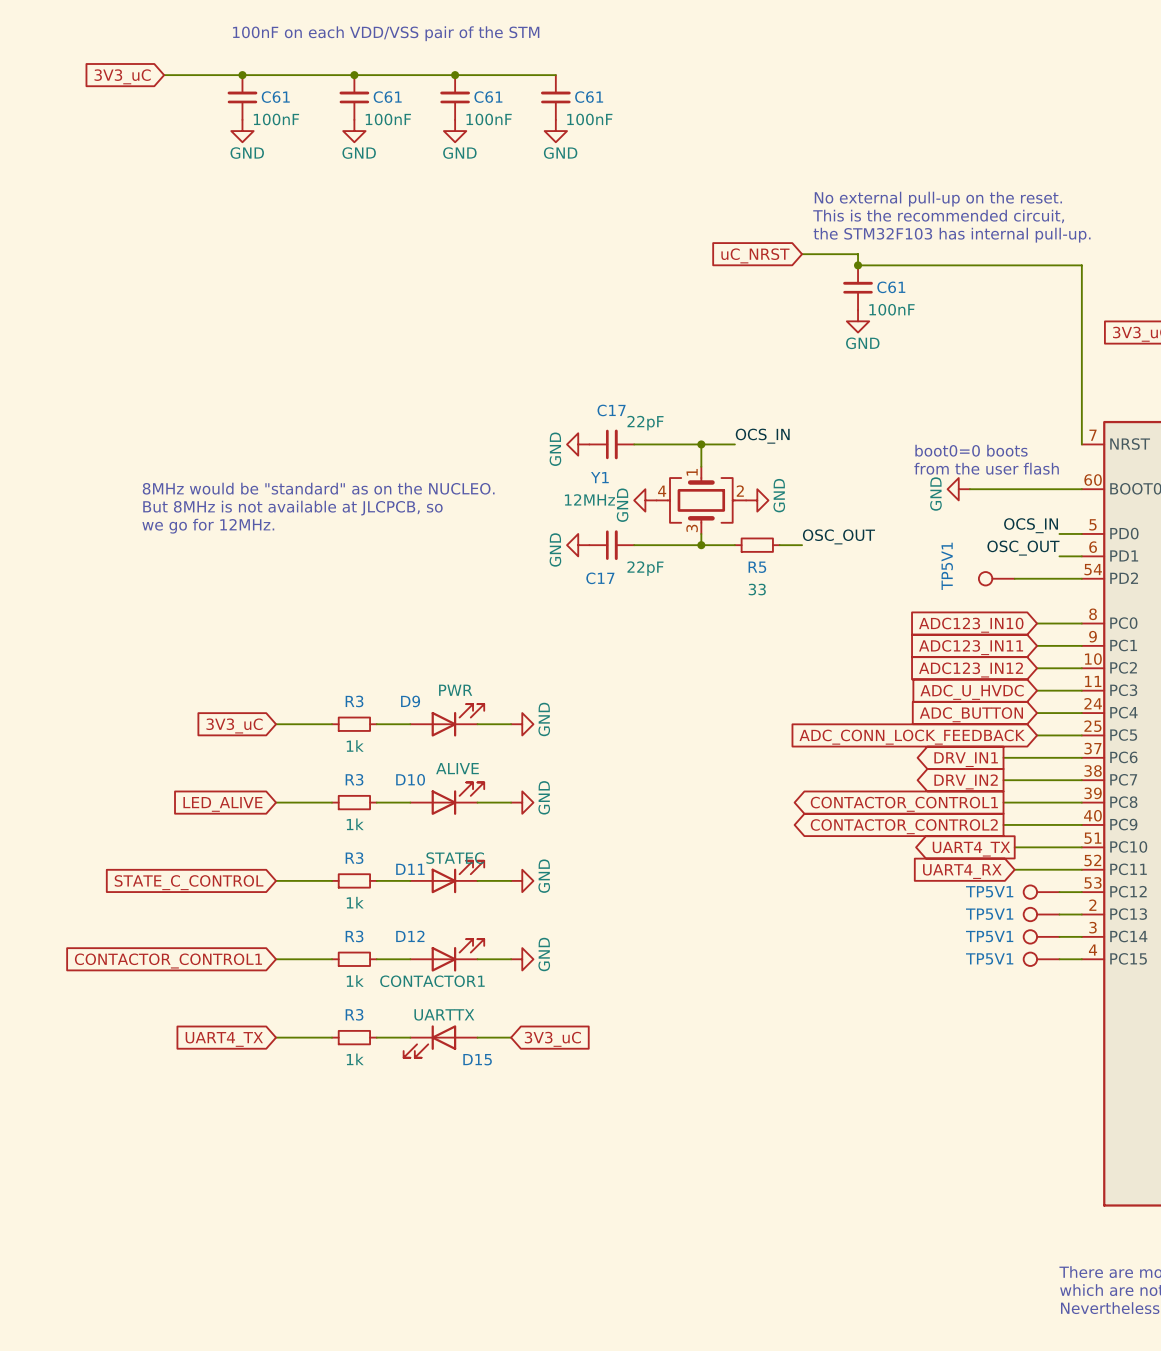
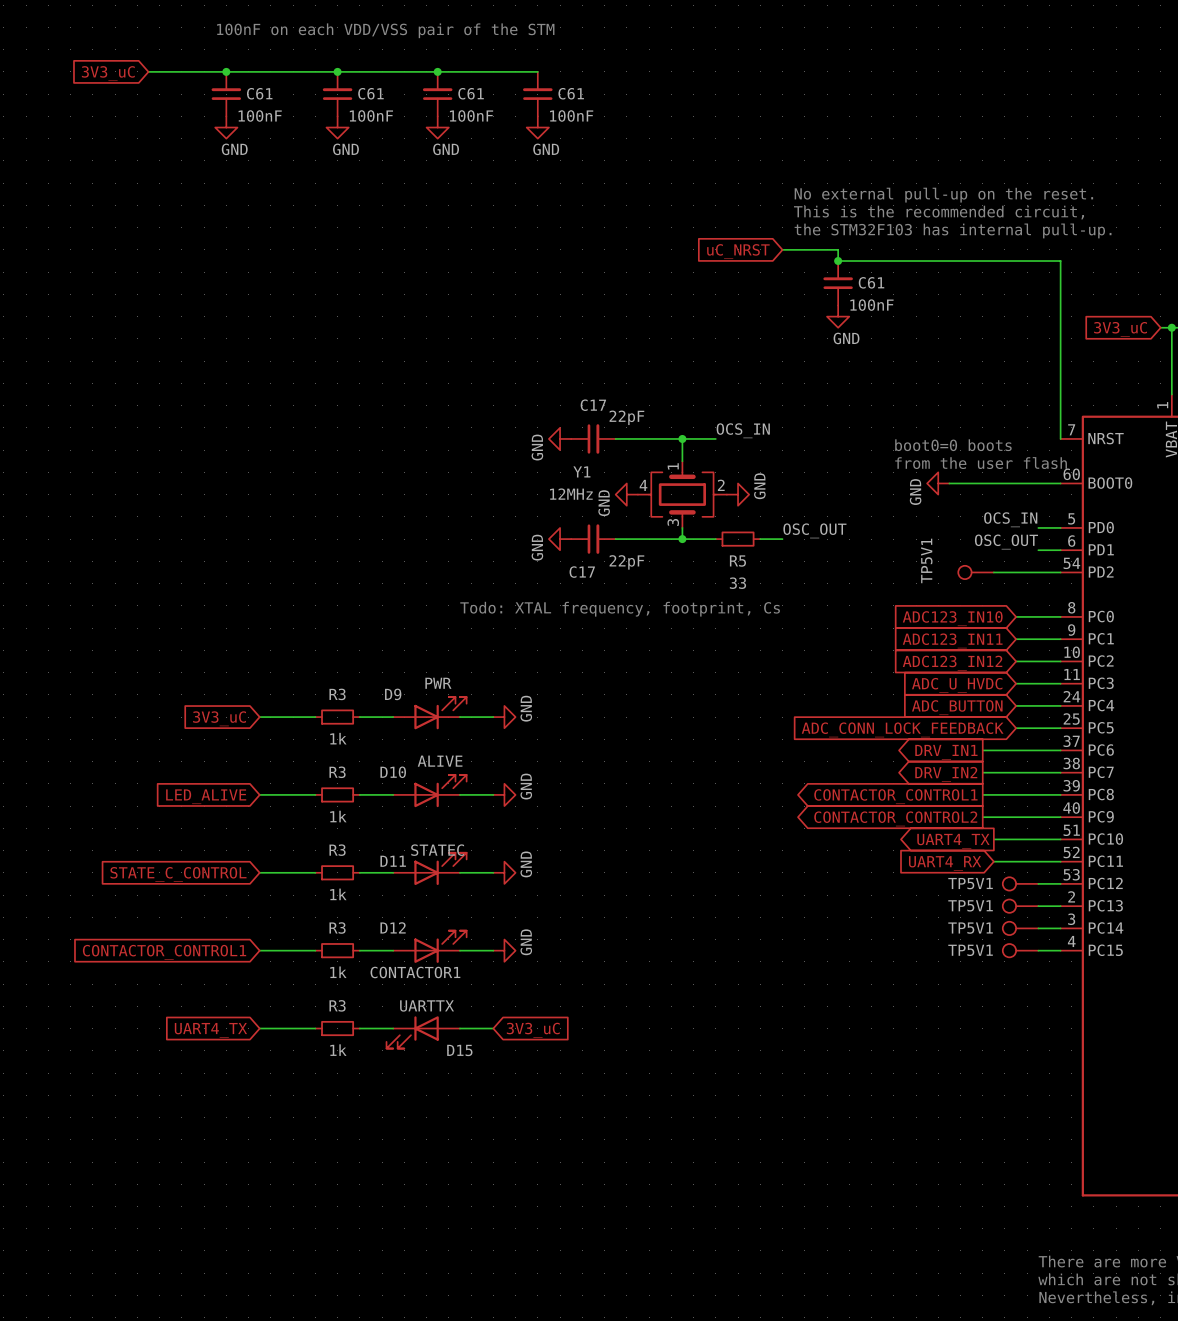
text: 8MHz would be "standard" as on the NUCLEO. (318, 488) -> none
text: But 8MHz is not available at JLCPCB, so (292, 508) -> none
text: we go for 12MHz. (208, 526) -> none
text: none -> Todo: XTAL frequency, footprint, Cs (620, 609)

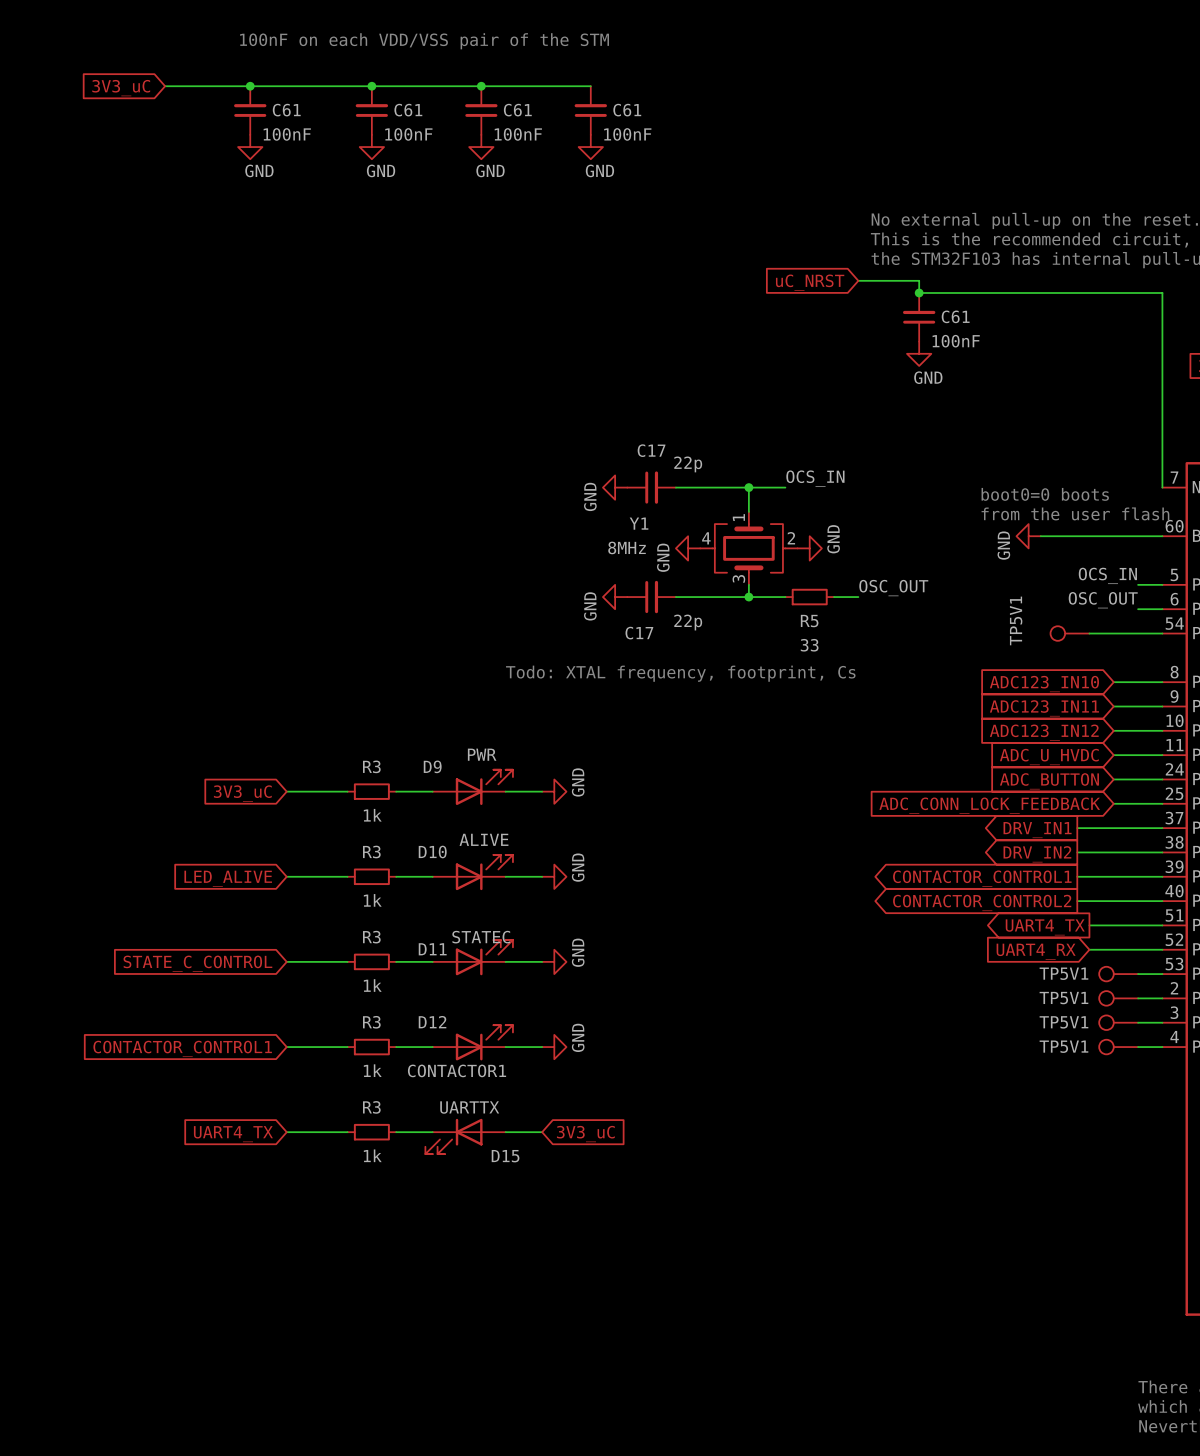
C17 value: 22pF (626, 417) -> 22p (688, 464)
Y1 value: 12MHz (571, 494) -> 8MHz (627, 547)
C17 value: 22pF (626, 562) -> 22p (688, 622)

